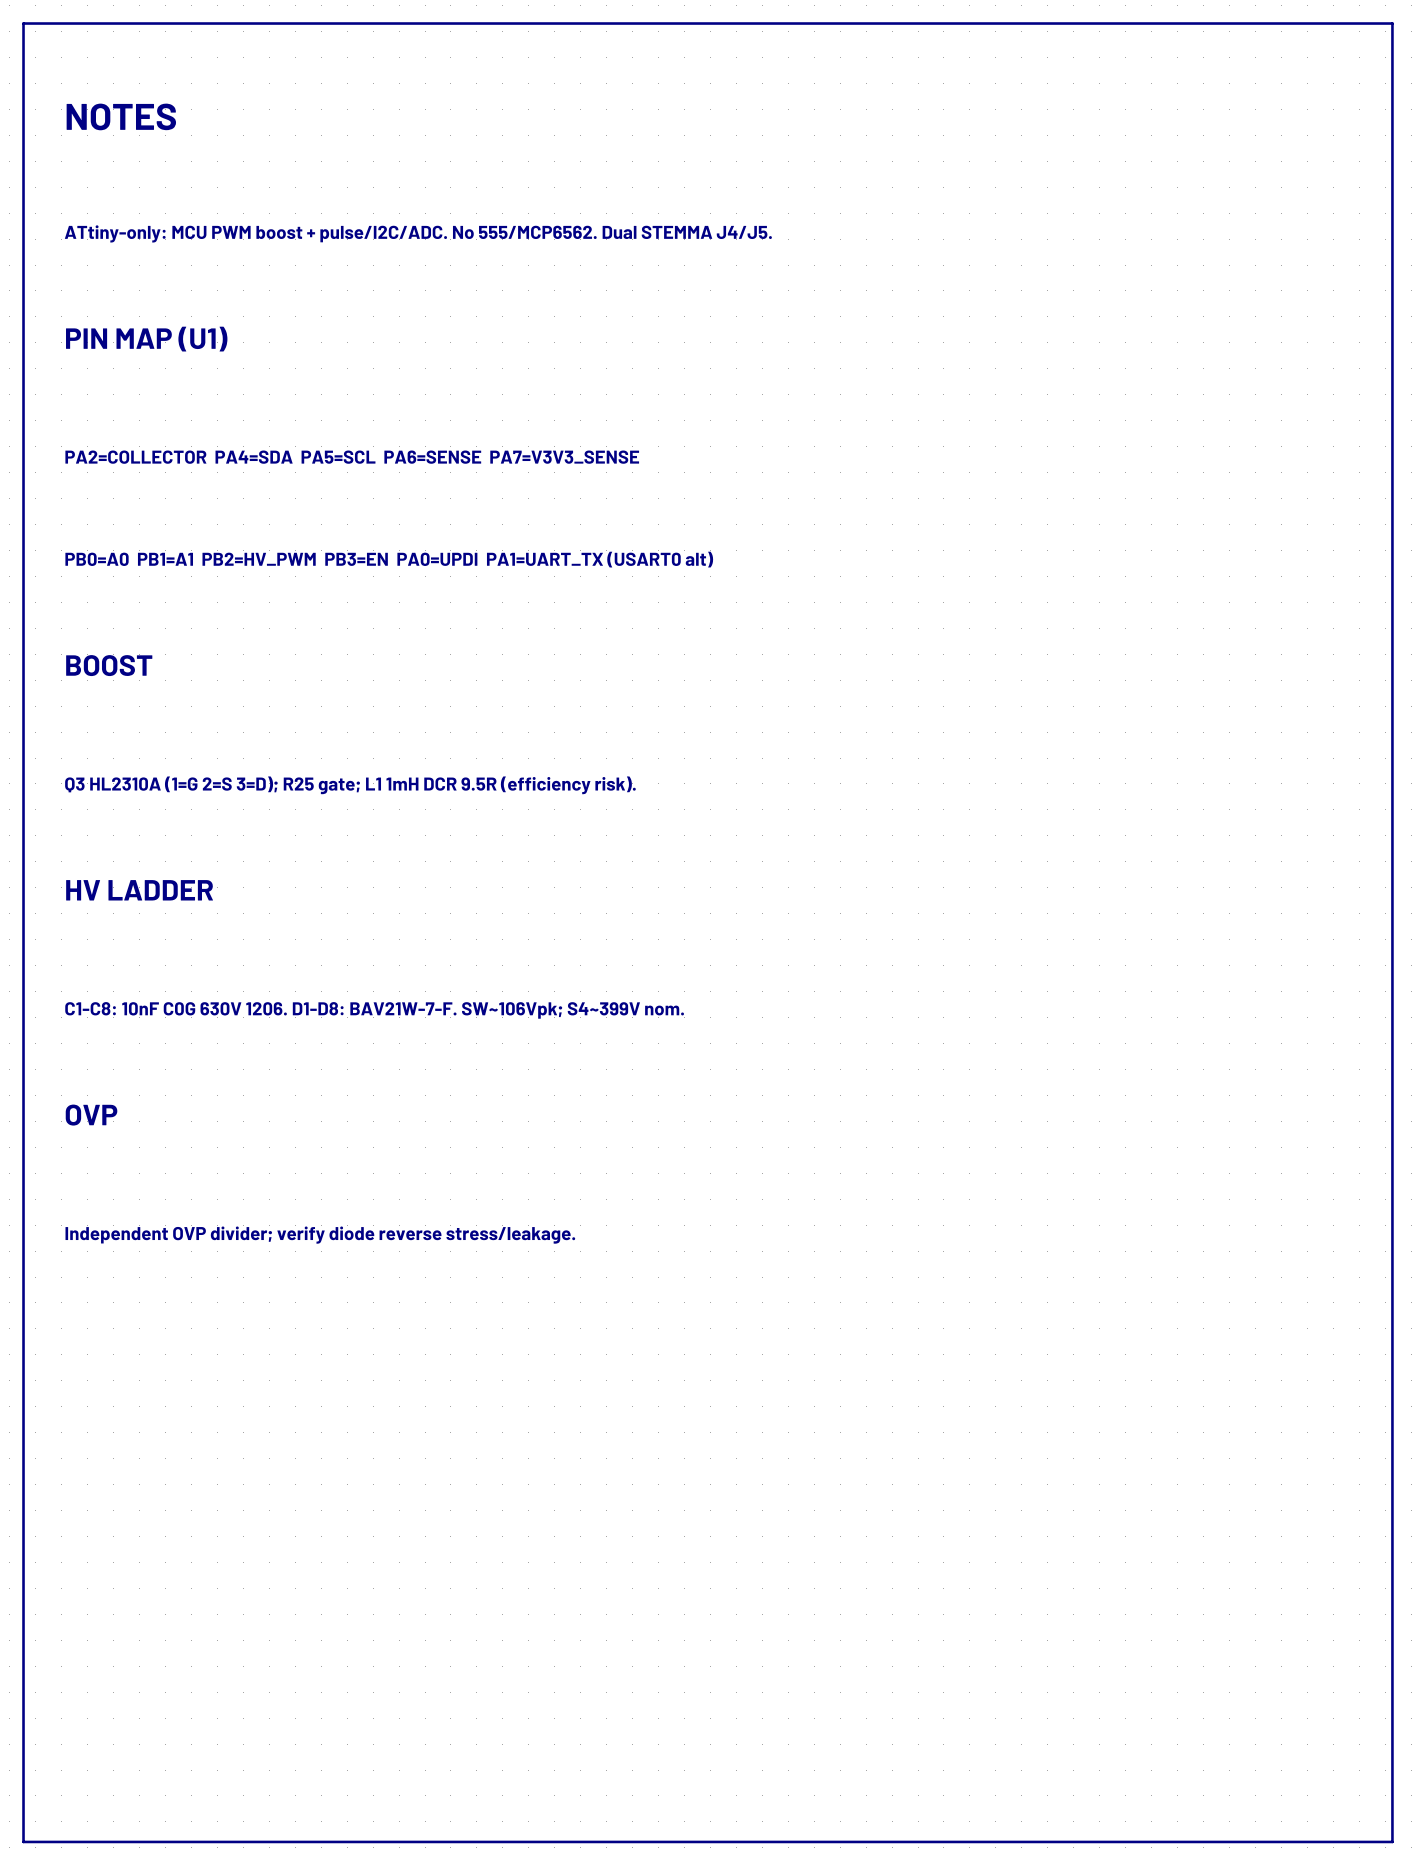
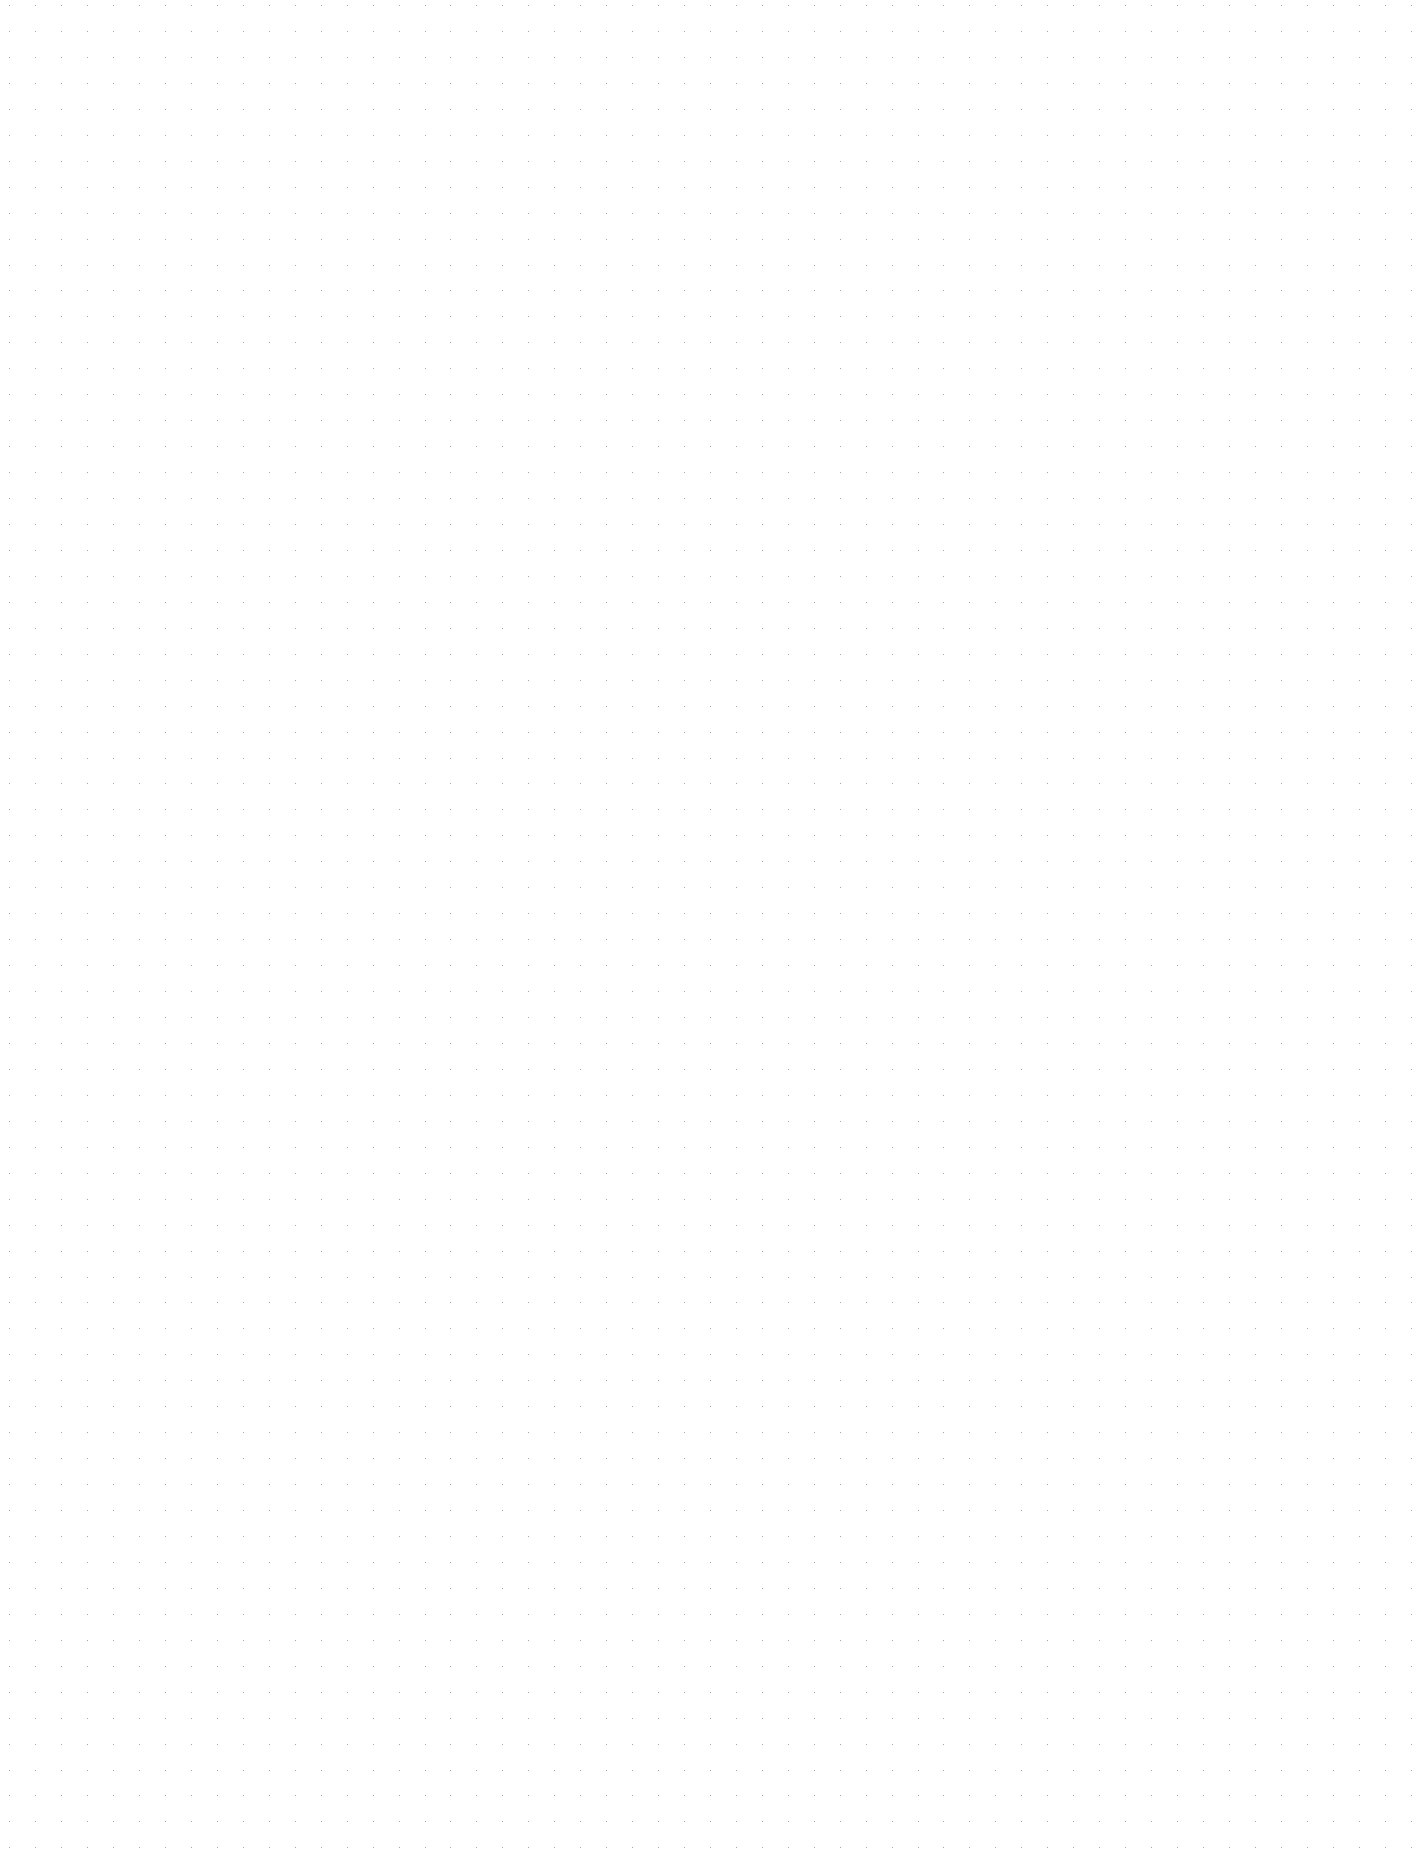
line: (23, 23) (1392, 23) (1392, 1841) (23, 1841) (23, 23) -> none
text: NOTES (121, 116) -> none
text: ATtiny-only: MCU PWM boost + pulse/I2C/ADC. No 555/MCP6562. Dual STEMMA J4/J5. (418, 233) -> none
text: PIN MAP (U1) (146, 339) -> none
text: PA2=COLLECTOR PA4=SDA PA5=SCL PA6=SENSE PA7=V3V3_SENSE (352, 457) -> none
text: PB0=A0 PB1=A1 PB2=HV_PWM PB3=EN PA0=UPDI PA1=UART_TX (USART0 alt) (389, 559) -> none
text: BOOST (109, 665) -> none
text: Q3 HL2310A (1=G 2=S 3=D); R25 gate; L1 1mH DCR 9.5R (efficiency risk). (350, 785) -> none
text: HV LADDER (139, 890) -> none
text: C1-C8: 10nF C0G 630V 1206. D1-D8: BAV21W-7-F. SW~106Vpk; S4~399V nom. (374, 1010) -> none
text: OVP (91, 1115) -> none
text: Independent OVP divider; verify diode reverse stress/leakage. (320, 1235) -> none

